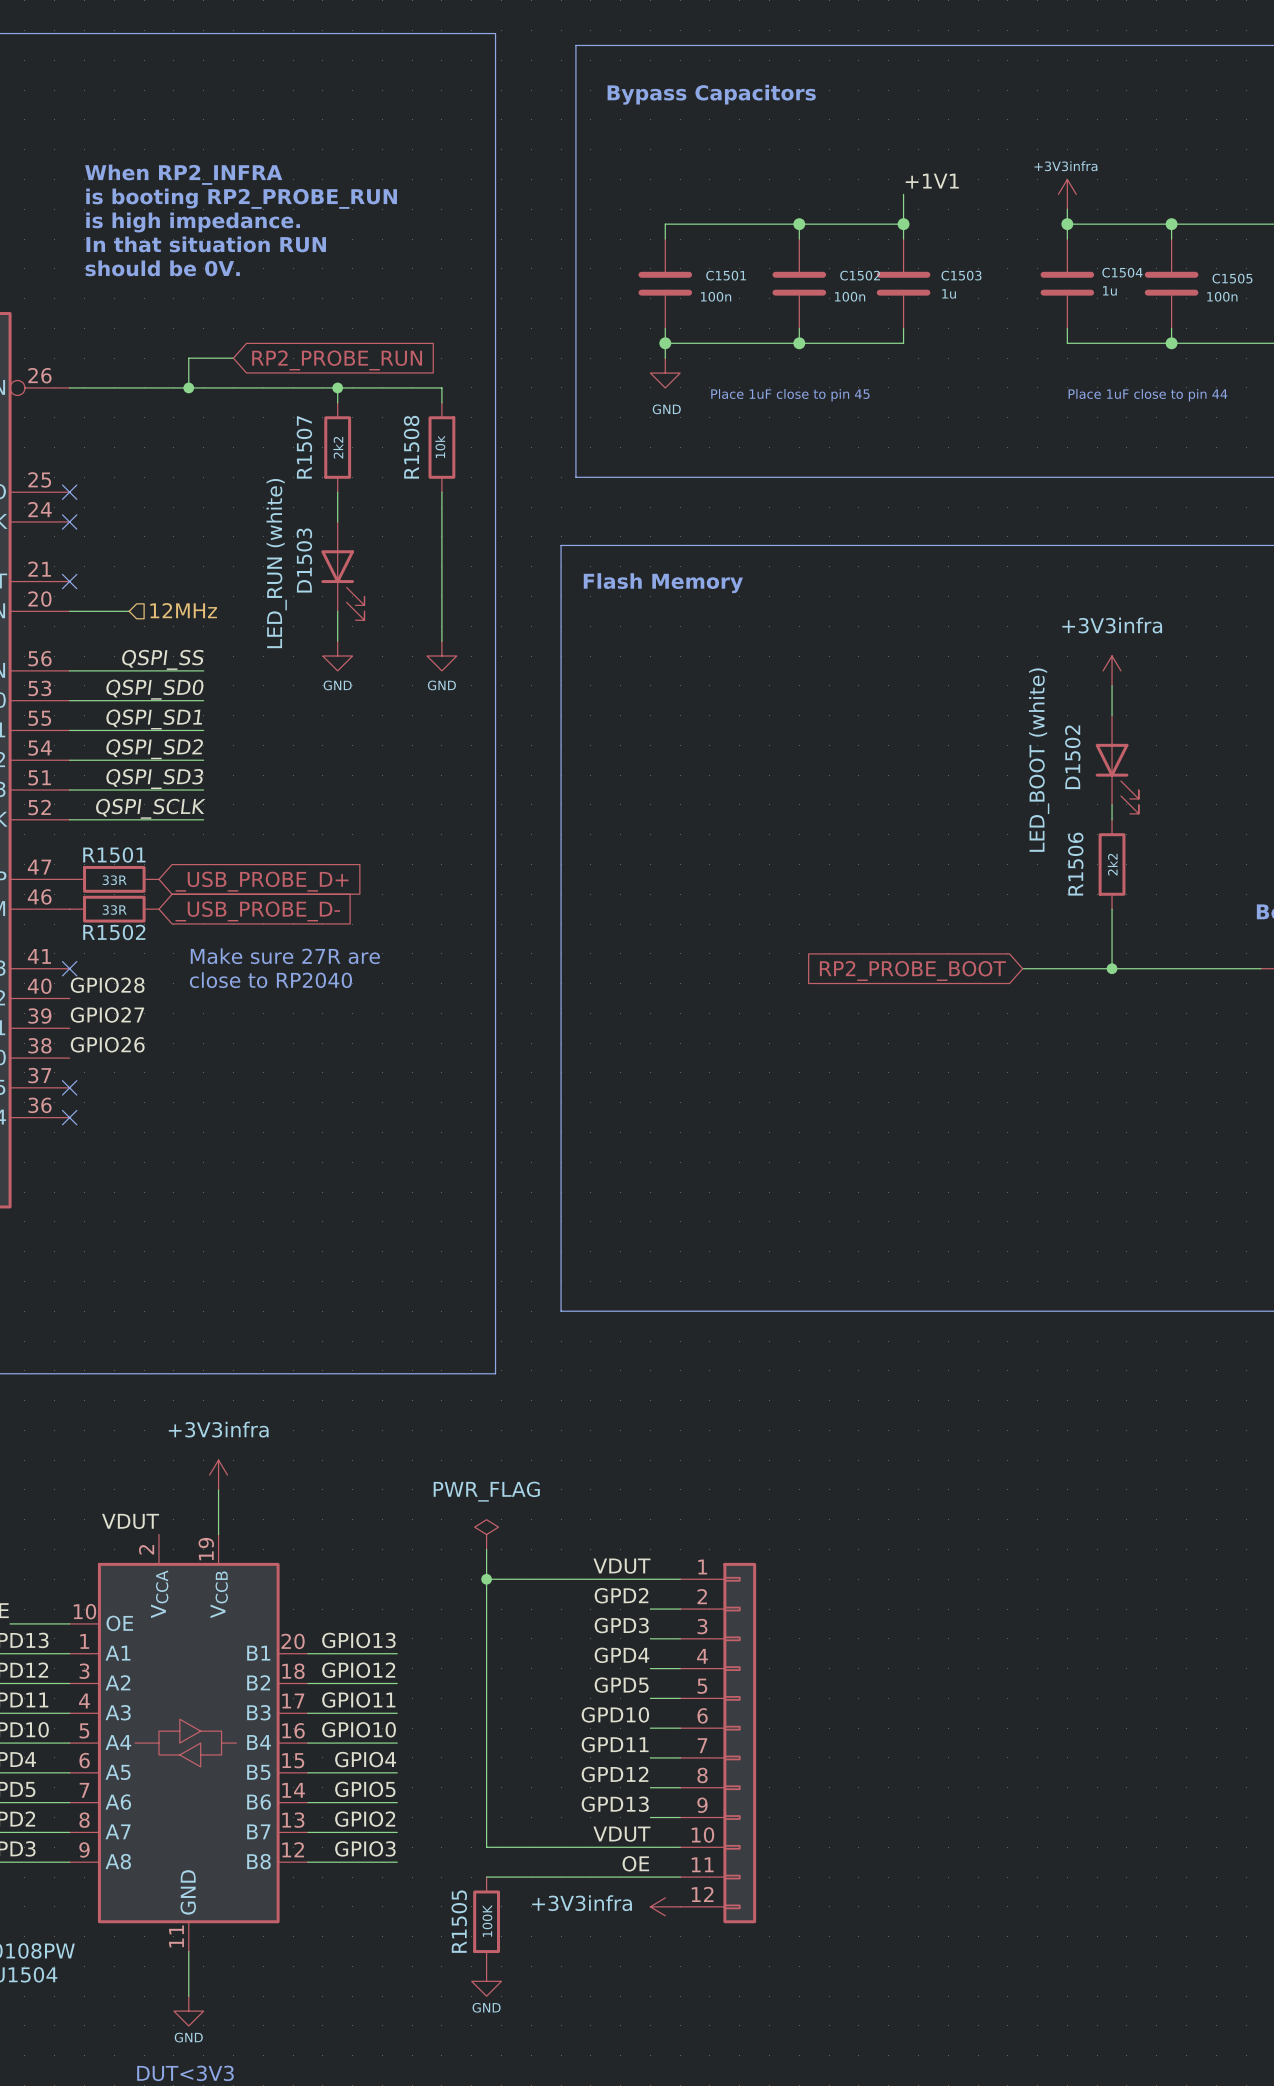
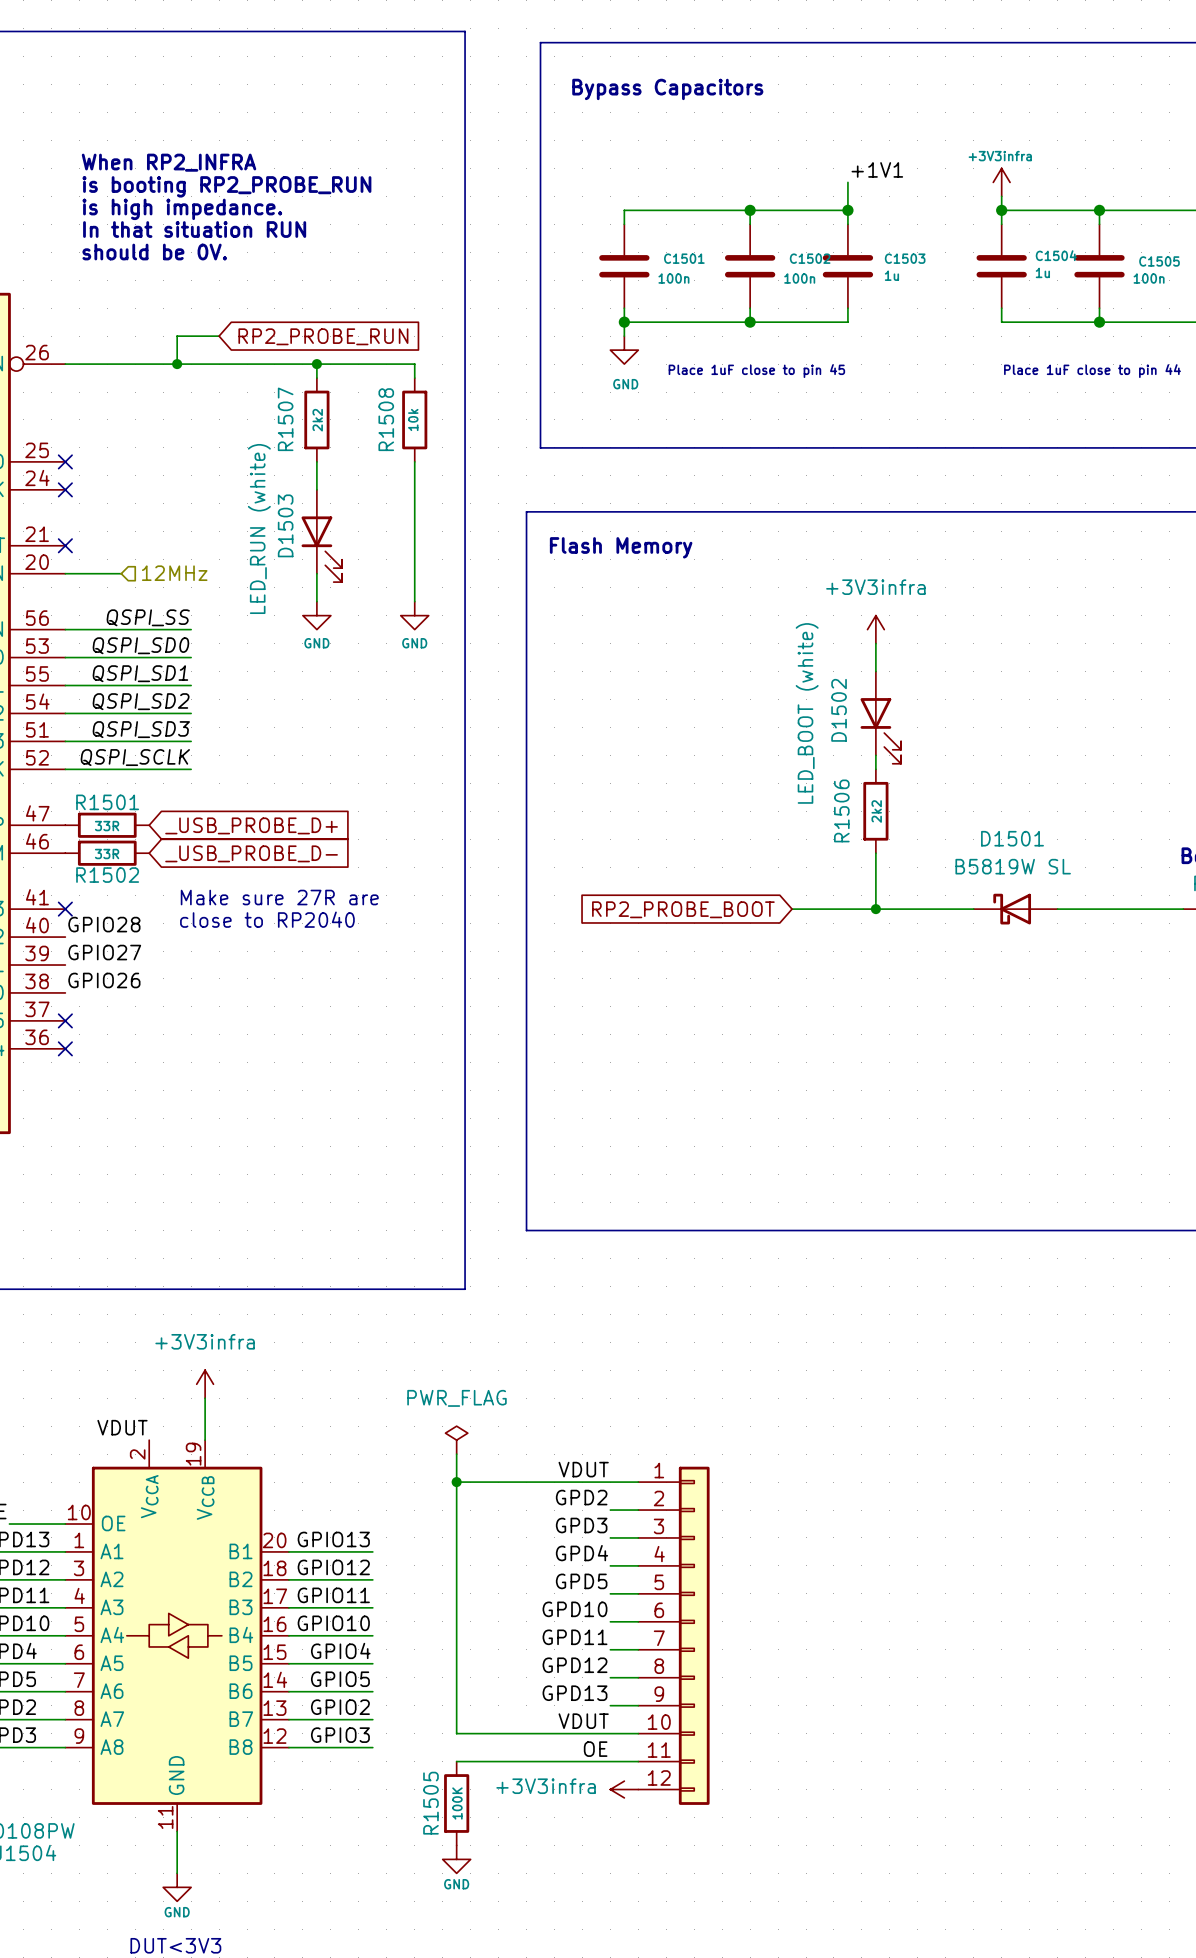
power symbol position: +3V3infra (1112, 670) -> +3V3infra (875, 629)
wire: (1112, 685) (1112, 715) -> (875, 643) (875, 671)
D1502 position: (1117, 764) -> (880, 717)
wire: (1112, 804) (1112, 819) -> (875, 755) (875, 769)
R1506 position: (1112, 864) -> (875, 811)
wire: (1112, 909) (1112, 968) -> (875, 853) (875, 909)
wire: none -> (792, 909) (959, 909)
junction: none -> (875, 909)
D1501: none -> B5819W SL (1015, 909)
junction: (1112, 968) -> none
global label position: RP2_PROBE_BOOT (912, 970) -> RP2_PROBE_BOOT (683, 909)

